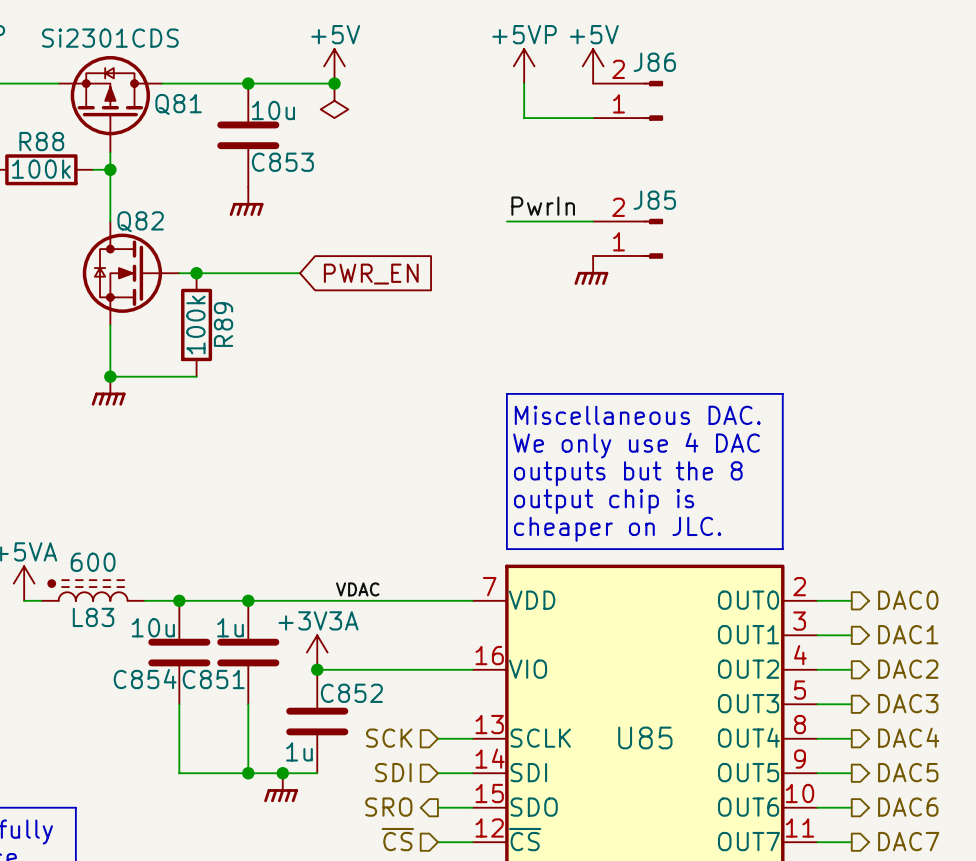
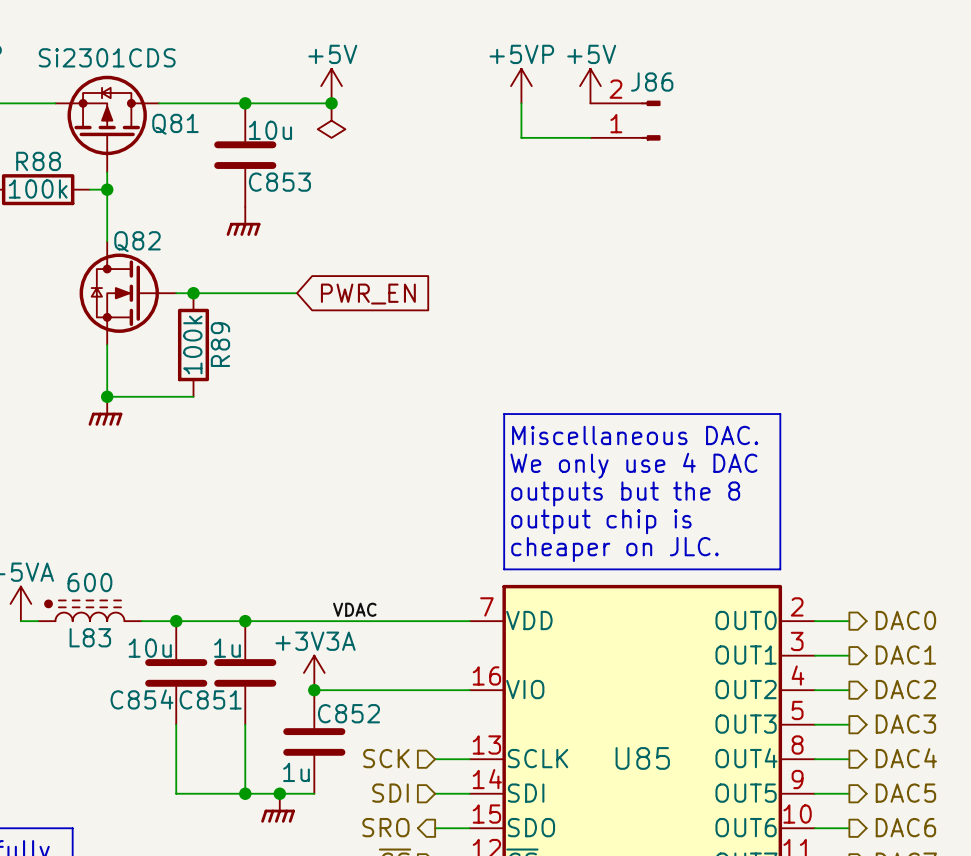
label: PwrIn (543, 206) -> none
wire: (506, 221) (593, 221) -> none
J85: (628, 238) -> none
power symbol: (591, 270) -> none

